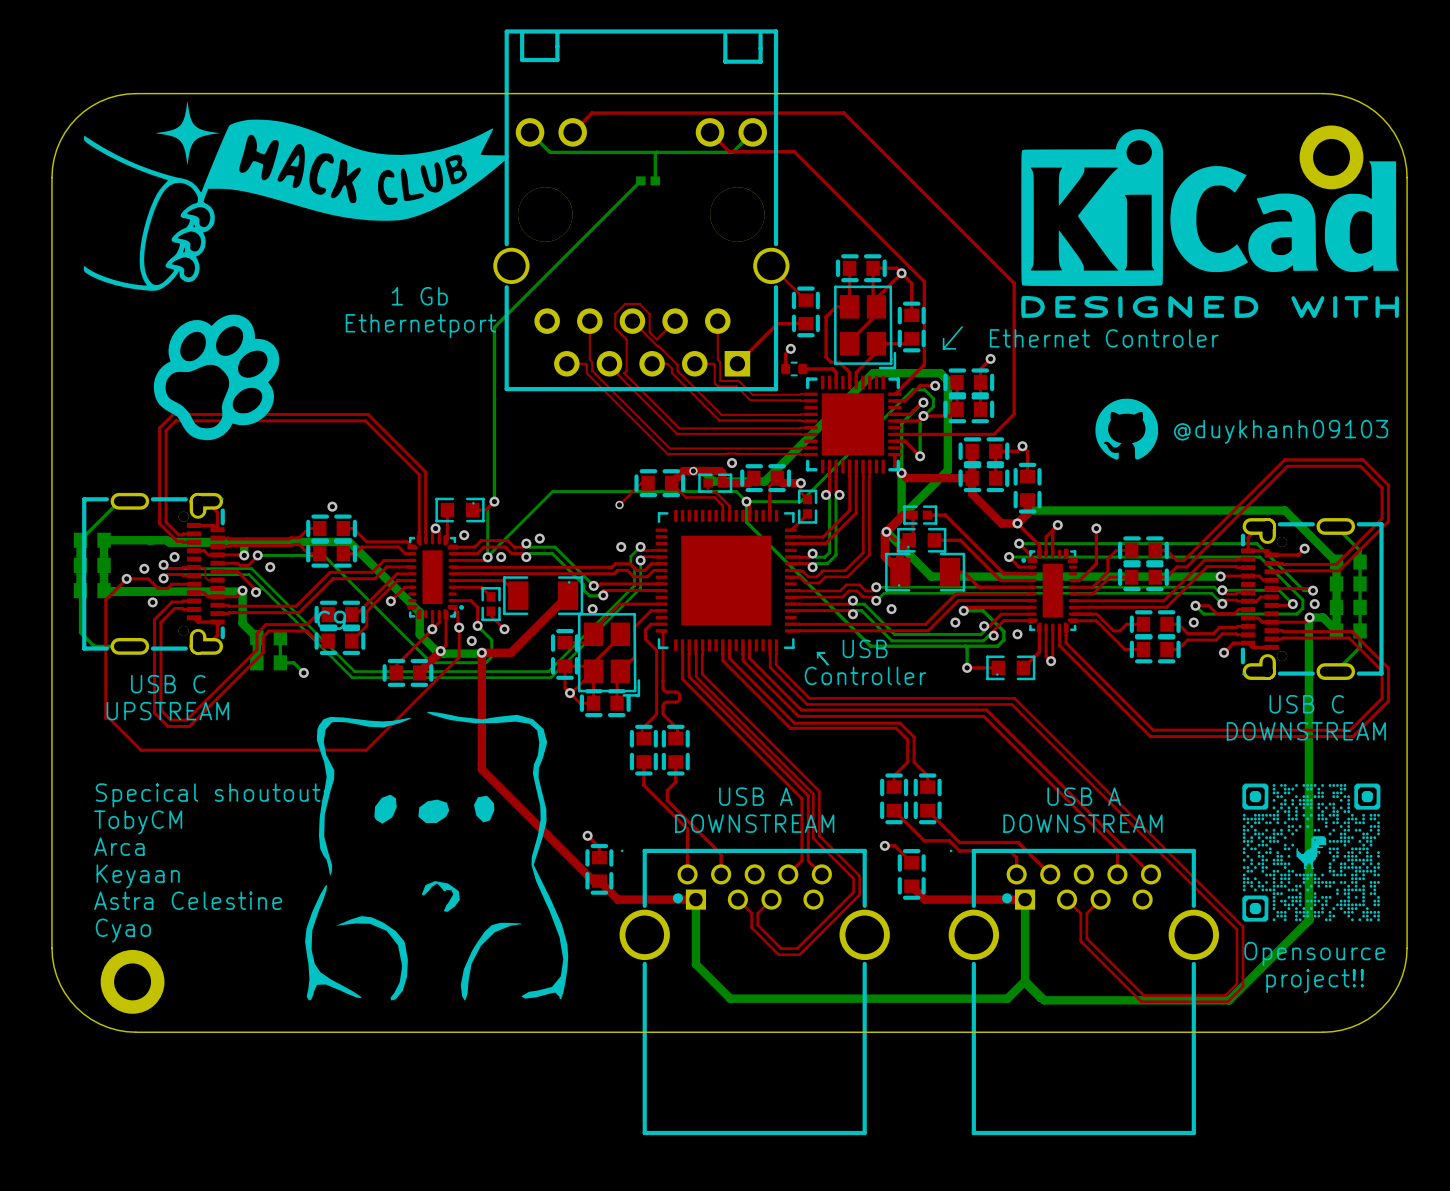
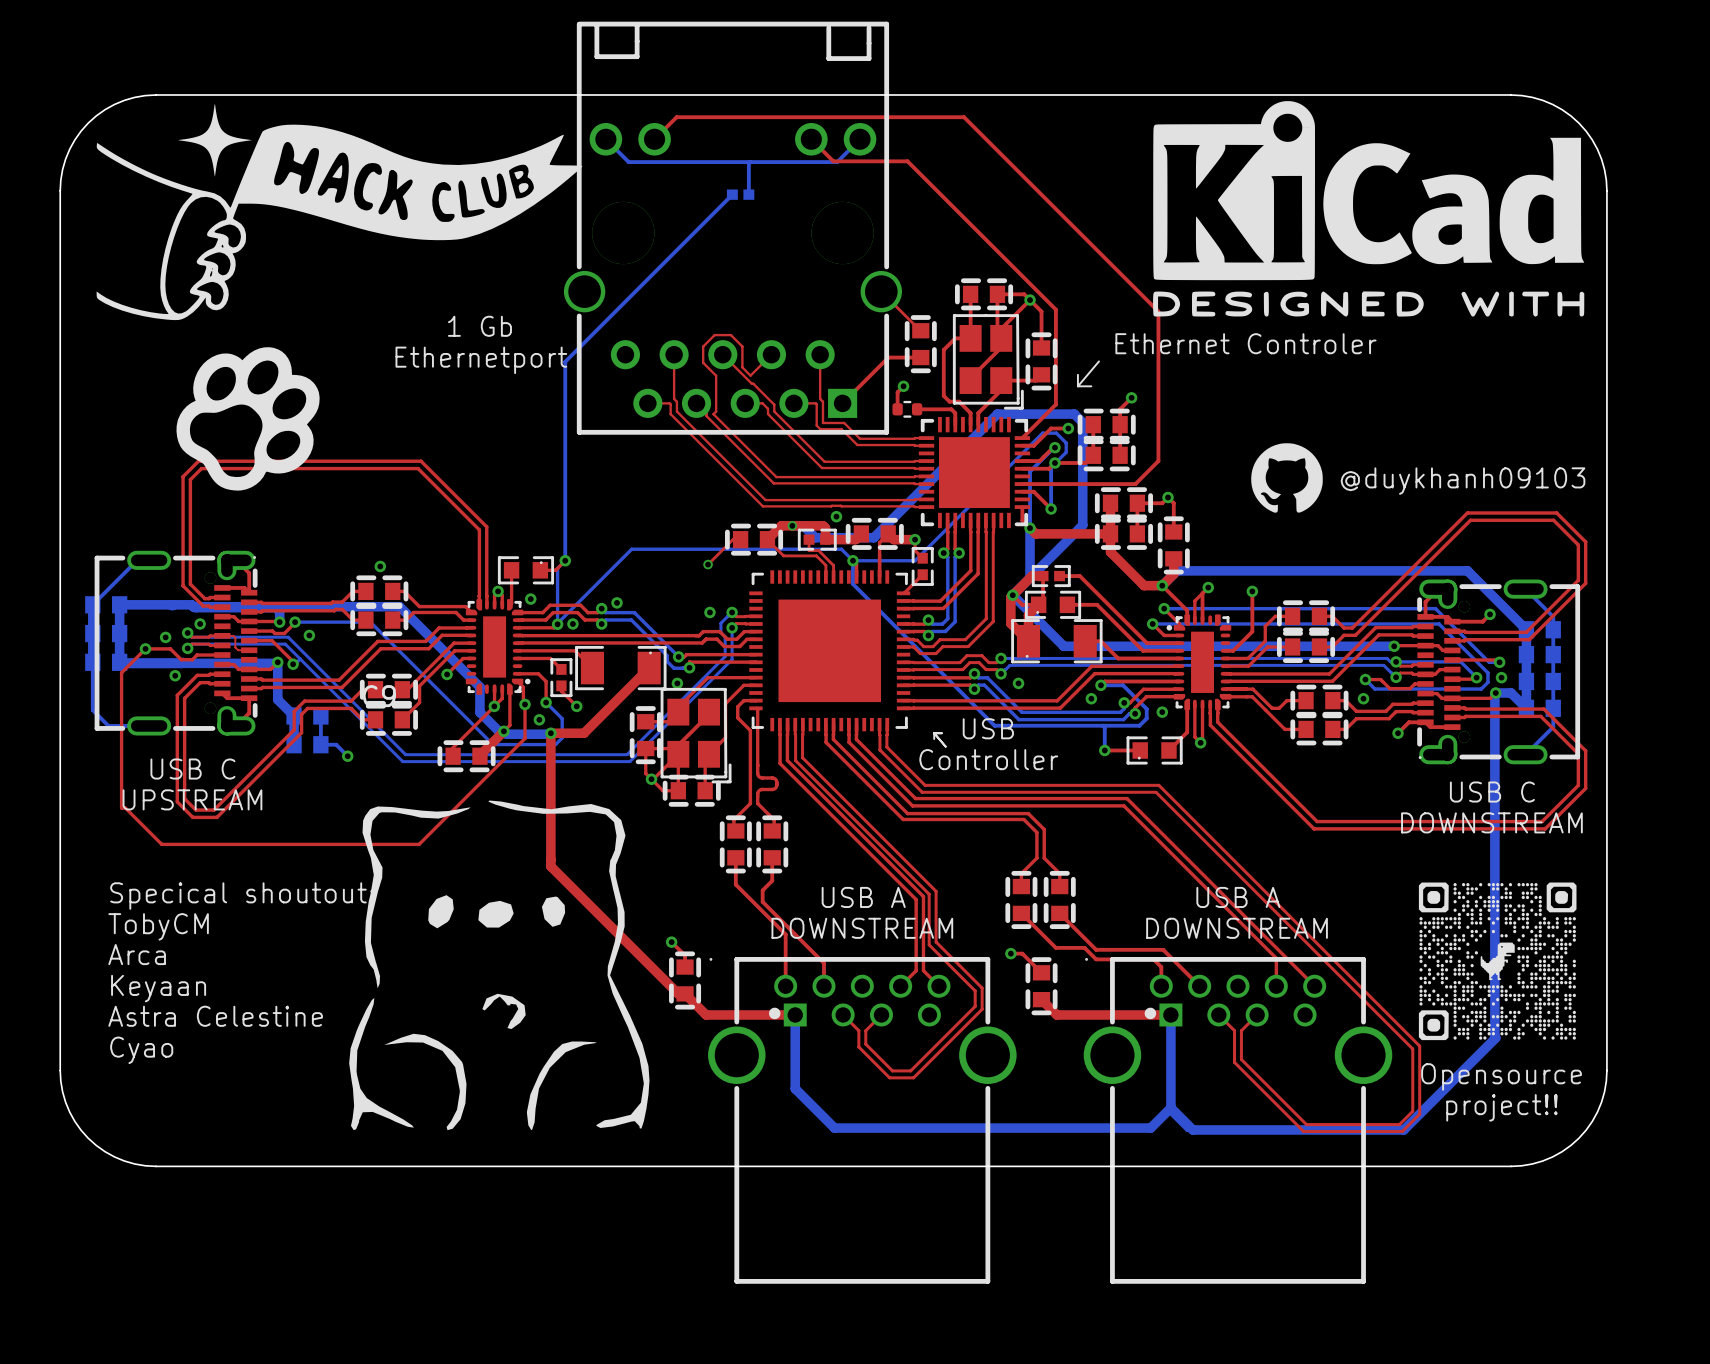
part: (1331, 157) -> none
drawing position: (1210, 223) -> (1368, 208)
text position: Ethernet Controler (1104, 338) -> Ethernet Controler (1245, 343)
part: (132, 981) -> none

